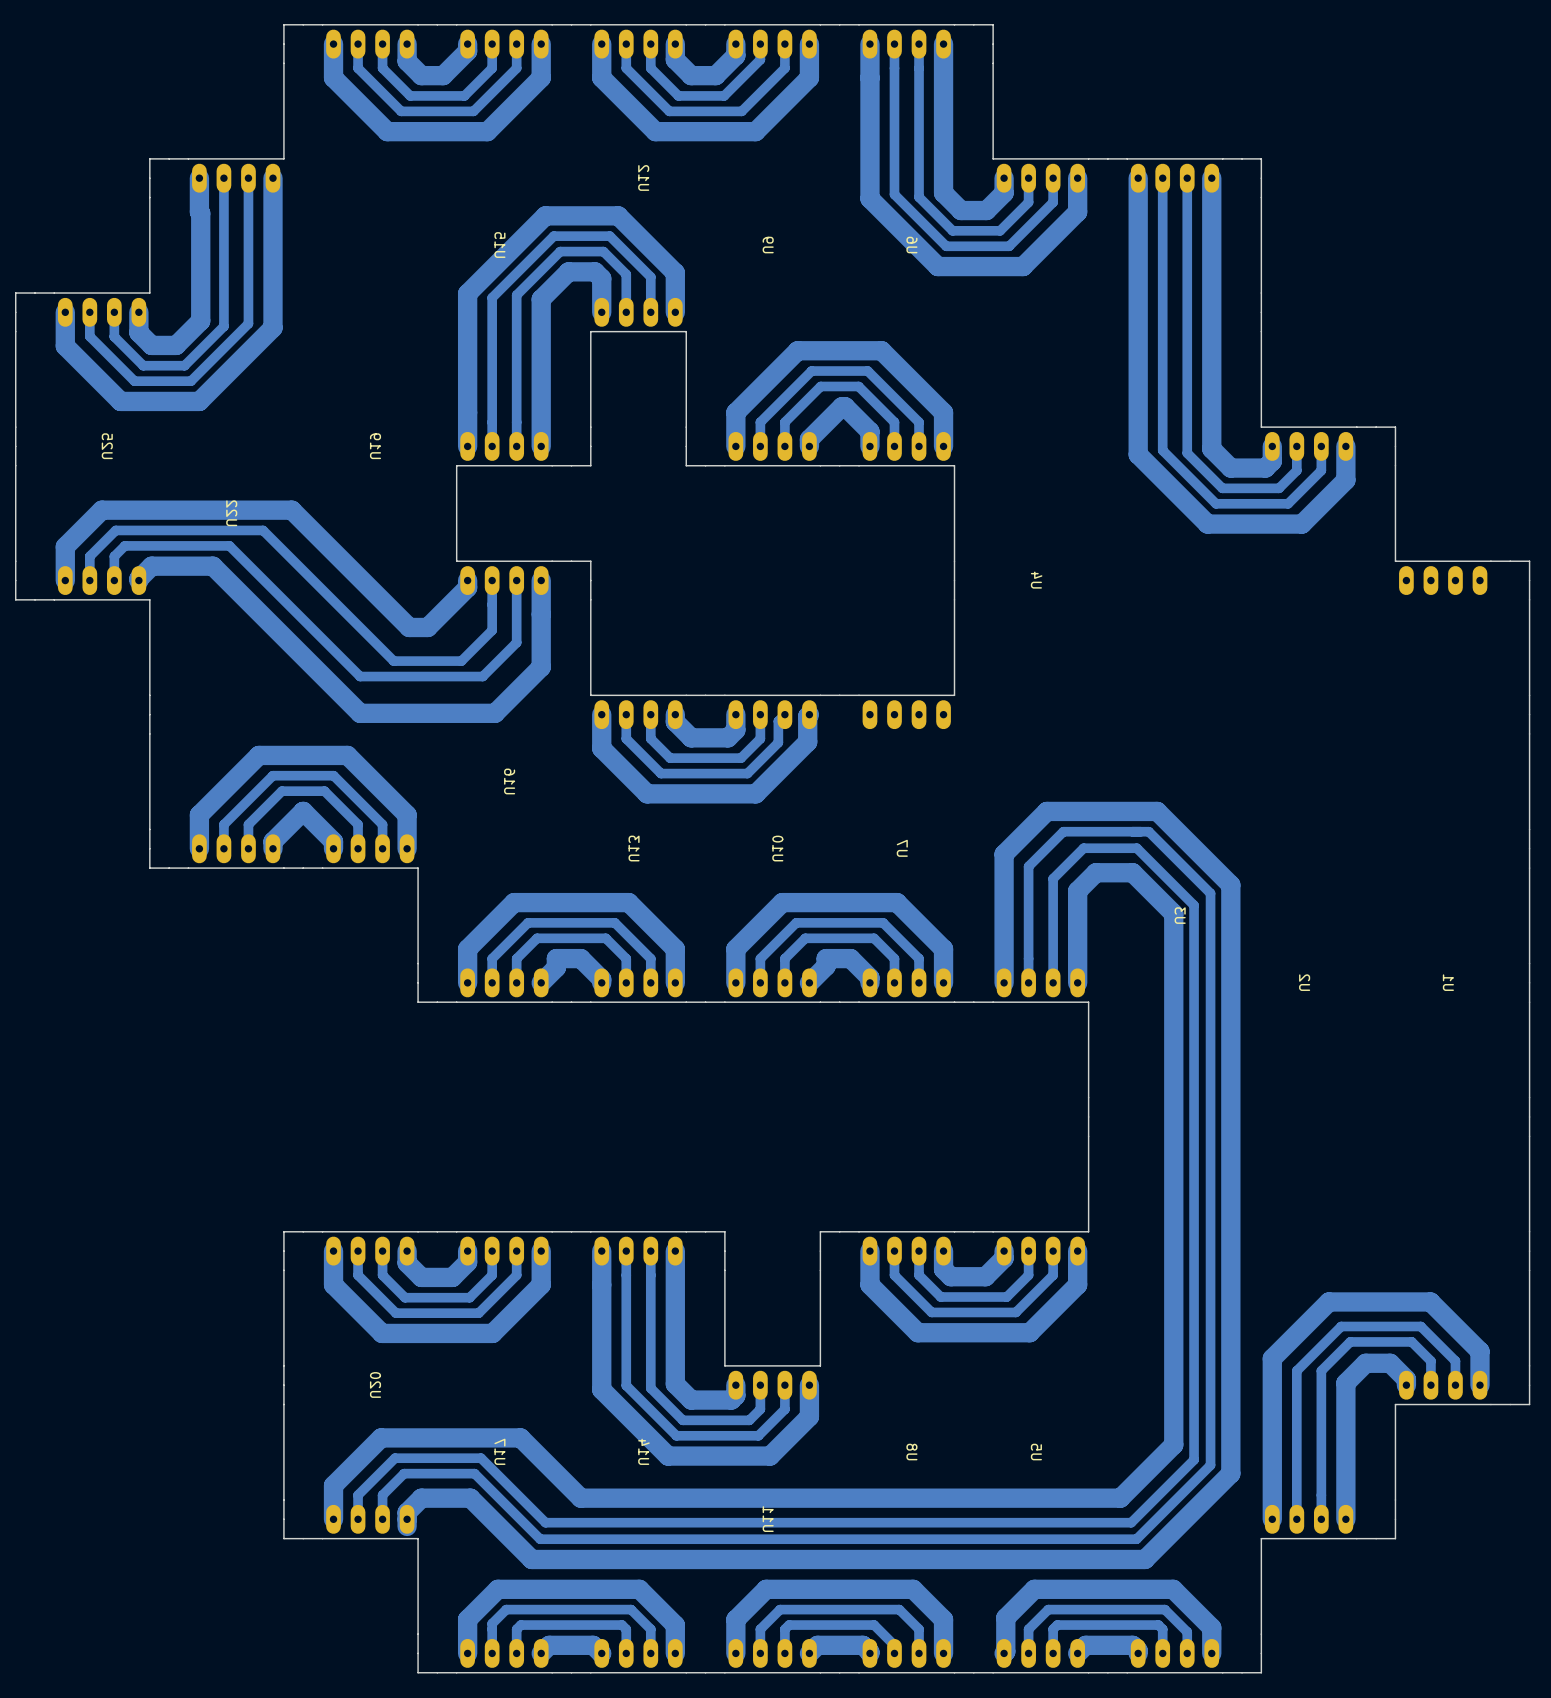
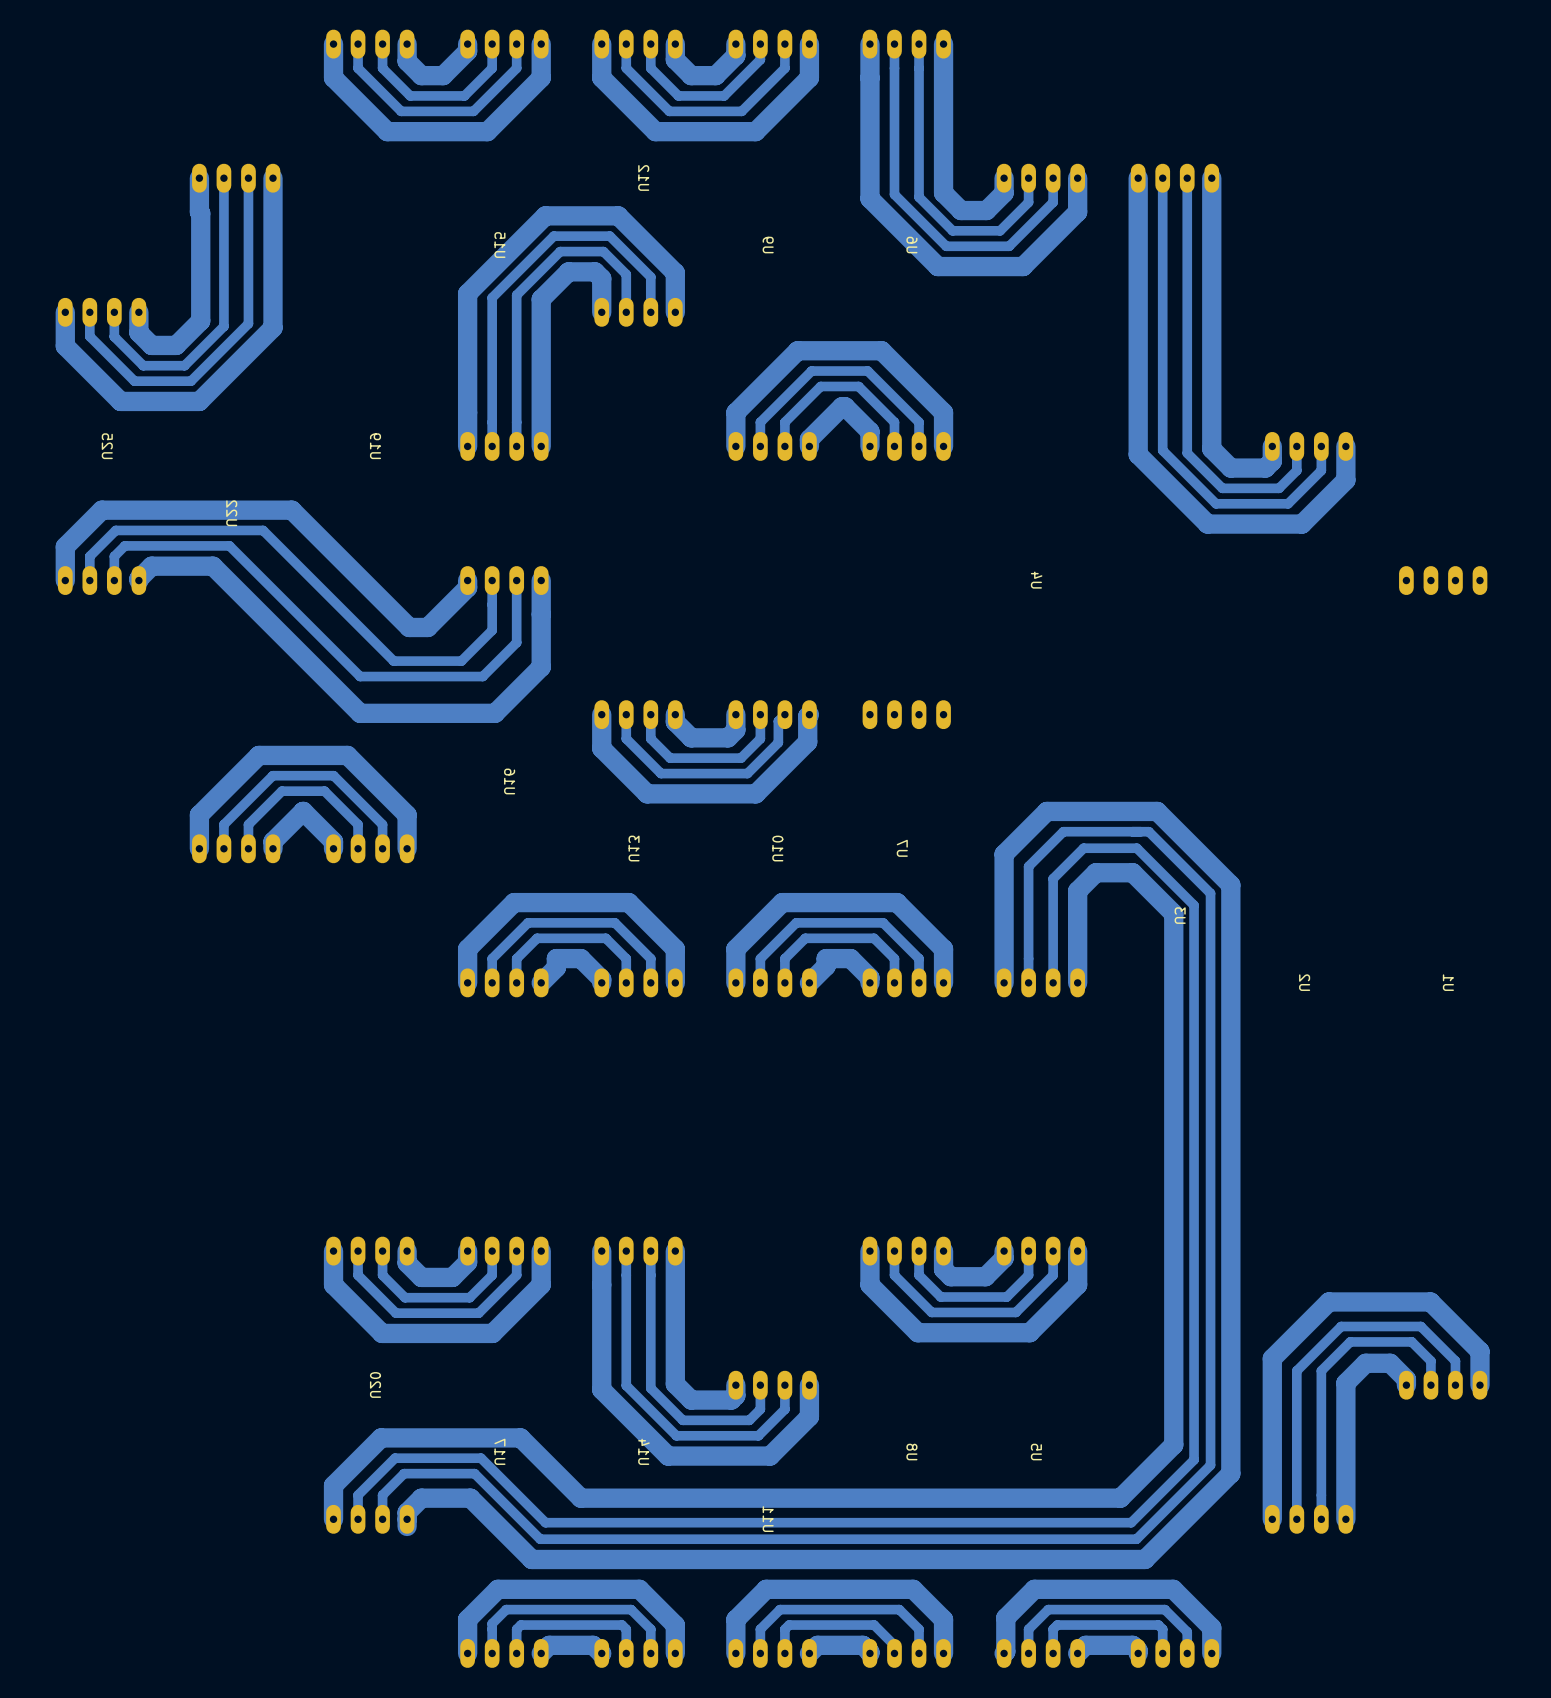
board edge: (993, 24) (283, 24) (283, 158) (149, 158) (149, 293) (15, 293) (15, 599) (149, 599) (149, 868) (418, 868) (418, 1002) (1088, 1002) (1088, 1231) (820, 1231) (820, 1365) (724, 1365) (724, 1231) (283, 1231) (283, 1538) (418, 1538) (418, 1672) (1261, 1672) (1261, 1538) (1395, 1538) (1395, 1404) (1529, 1404) (1529, 561) (1395, 561) (1395, 427) (1261, 427) (1261, 158) (993, 158) (993, 24) -> none
board edge: (686, 331) (686, 465) (954, 465) (954, 695) (590, 695) (590, 561) (456, 561) (456, 465) (590, 465) (590, 331) (686, 331) -> none

